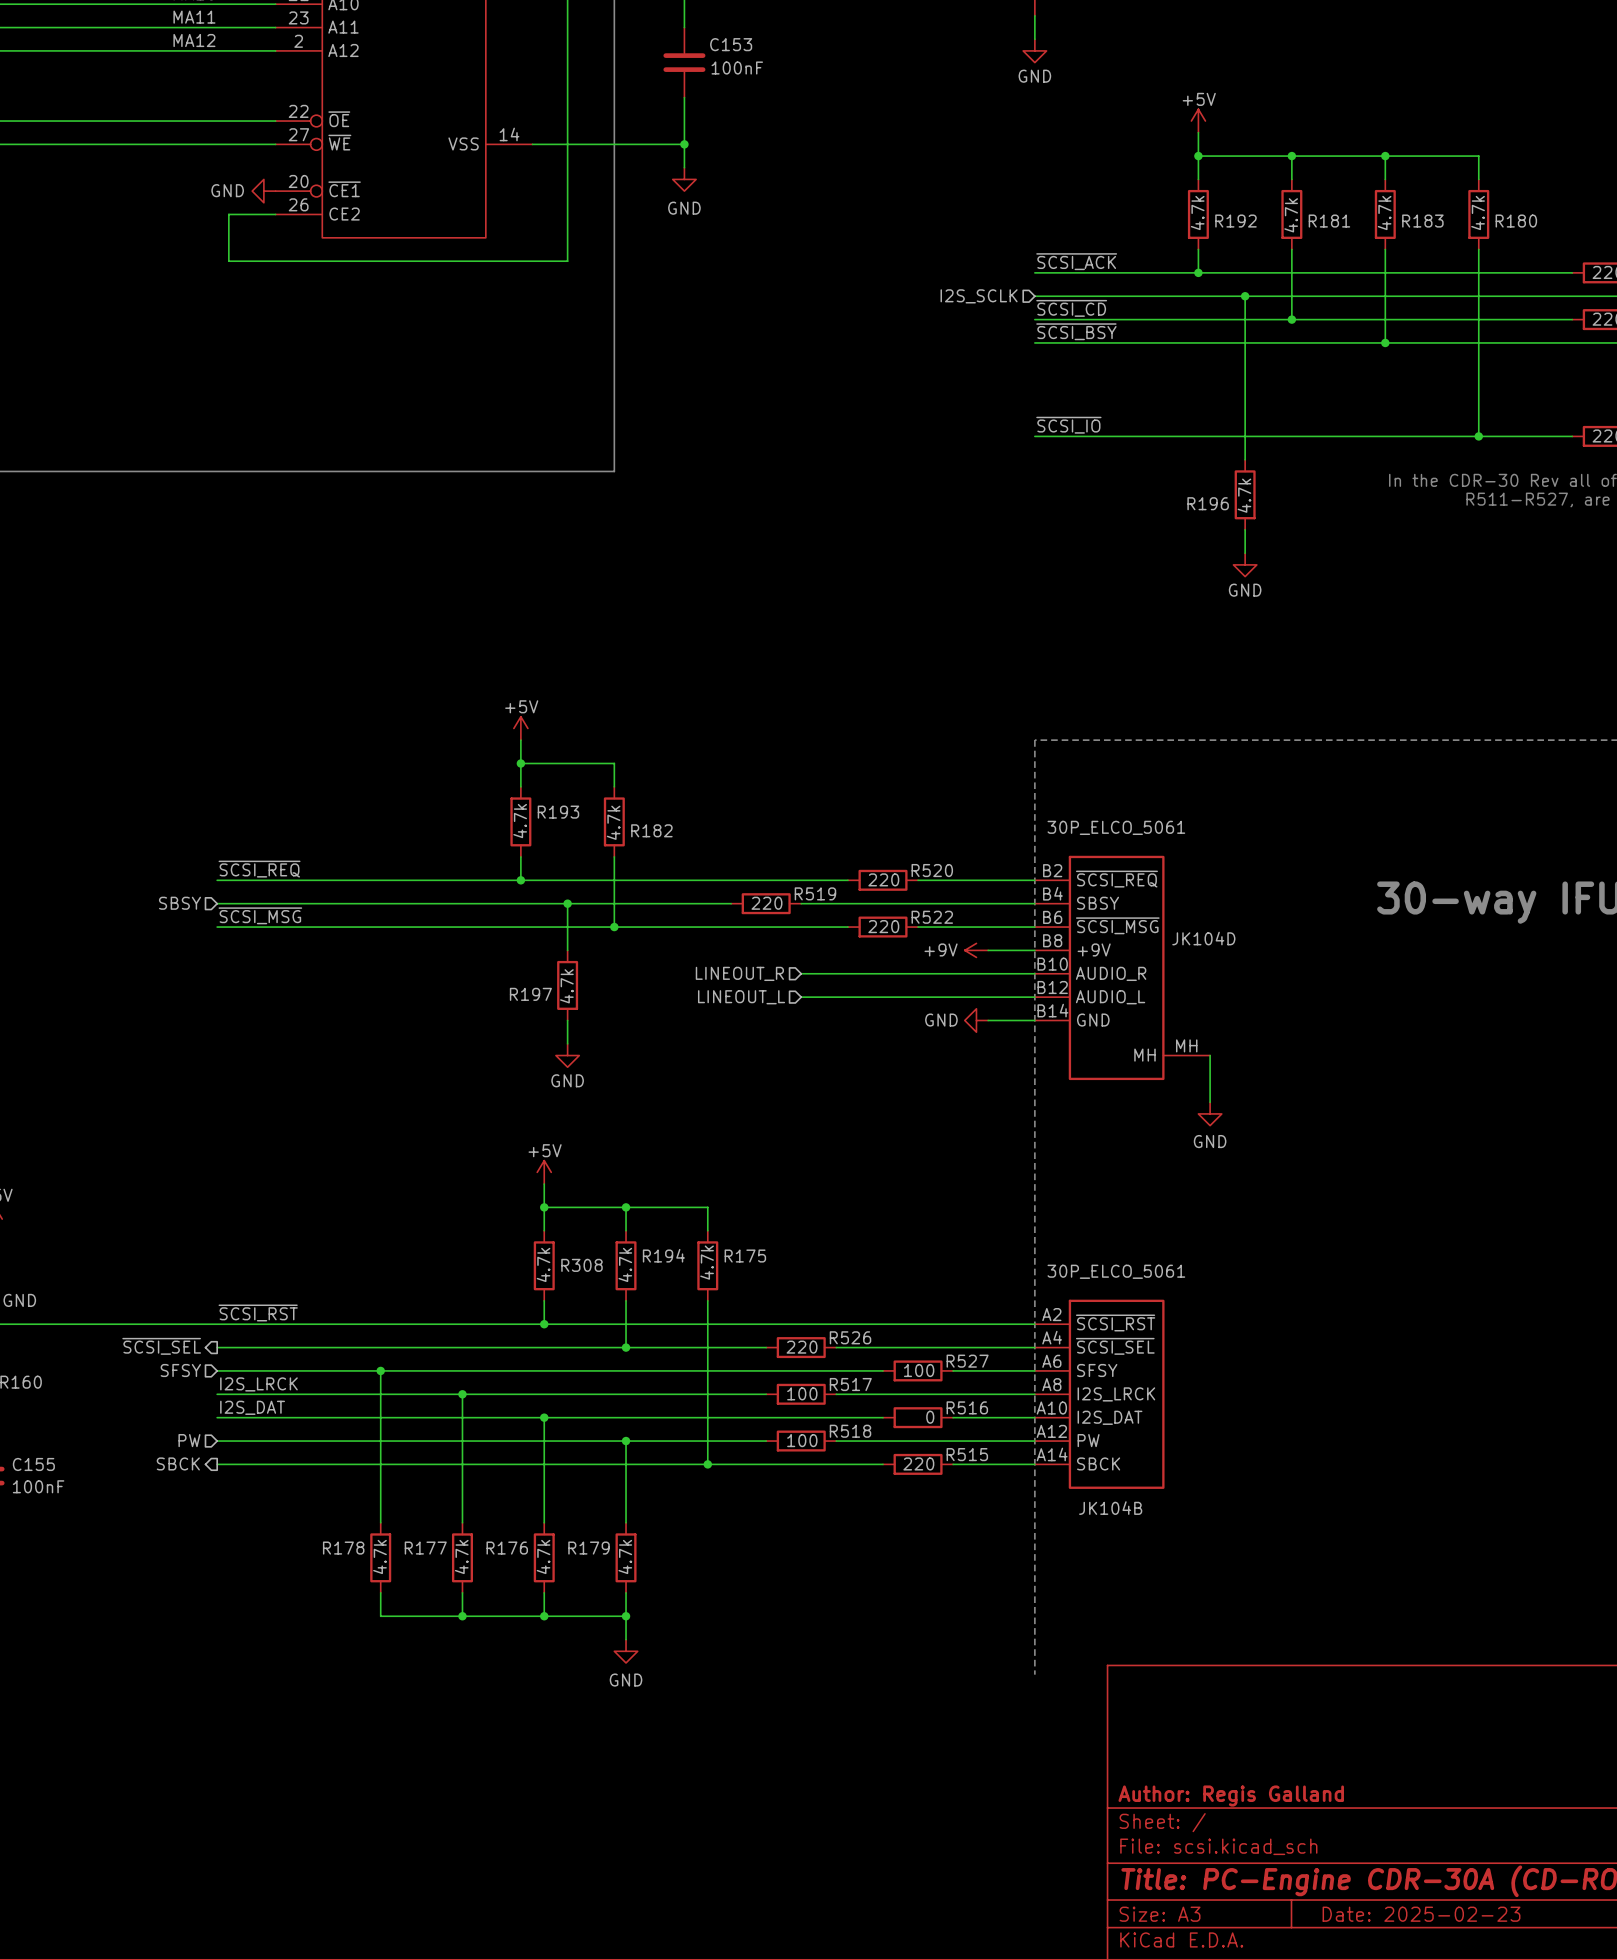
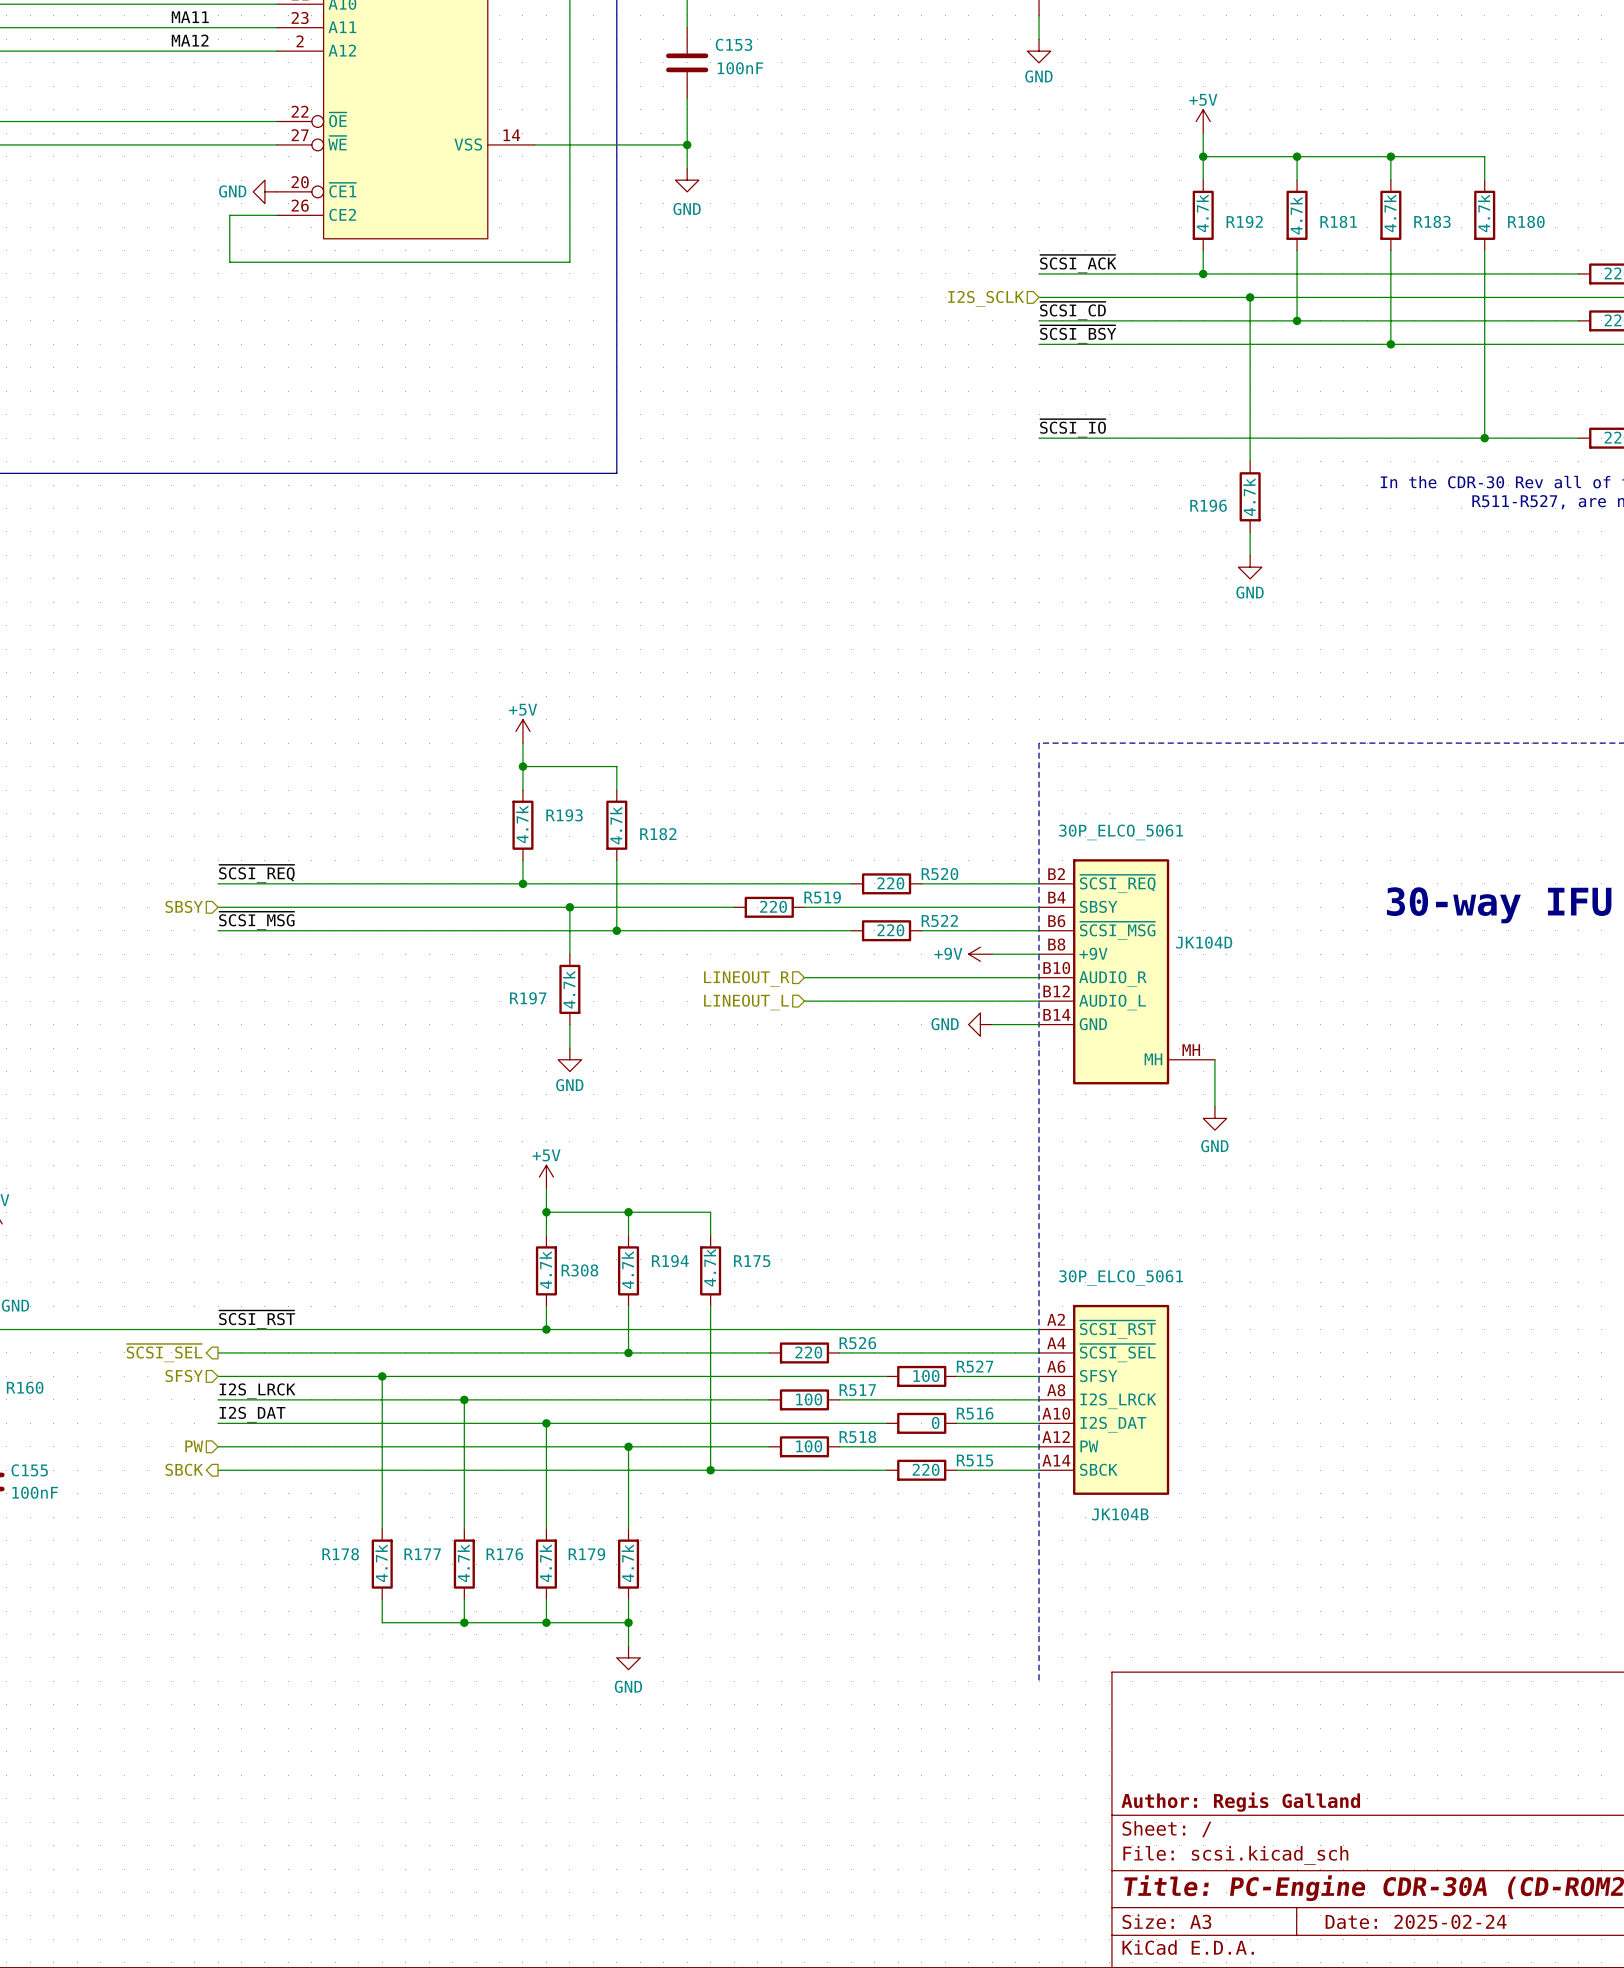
title block: Date: 2025-02-23 (1421, 1914) -> Date: 2025-02-24 (1416, 1921)

